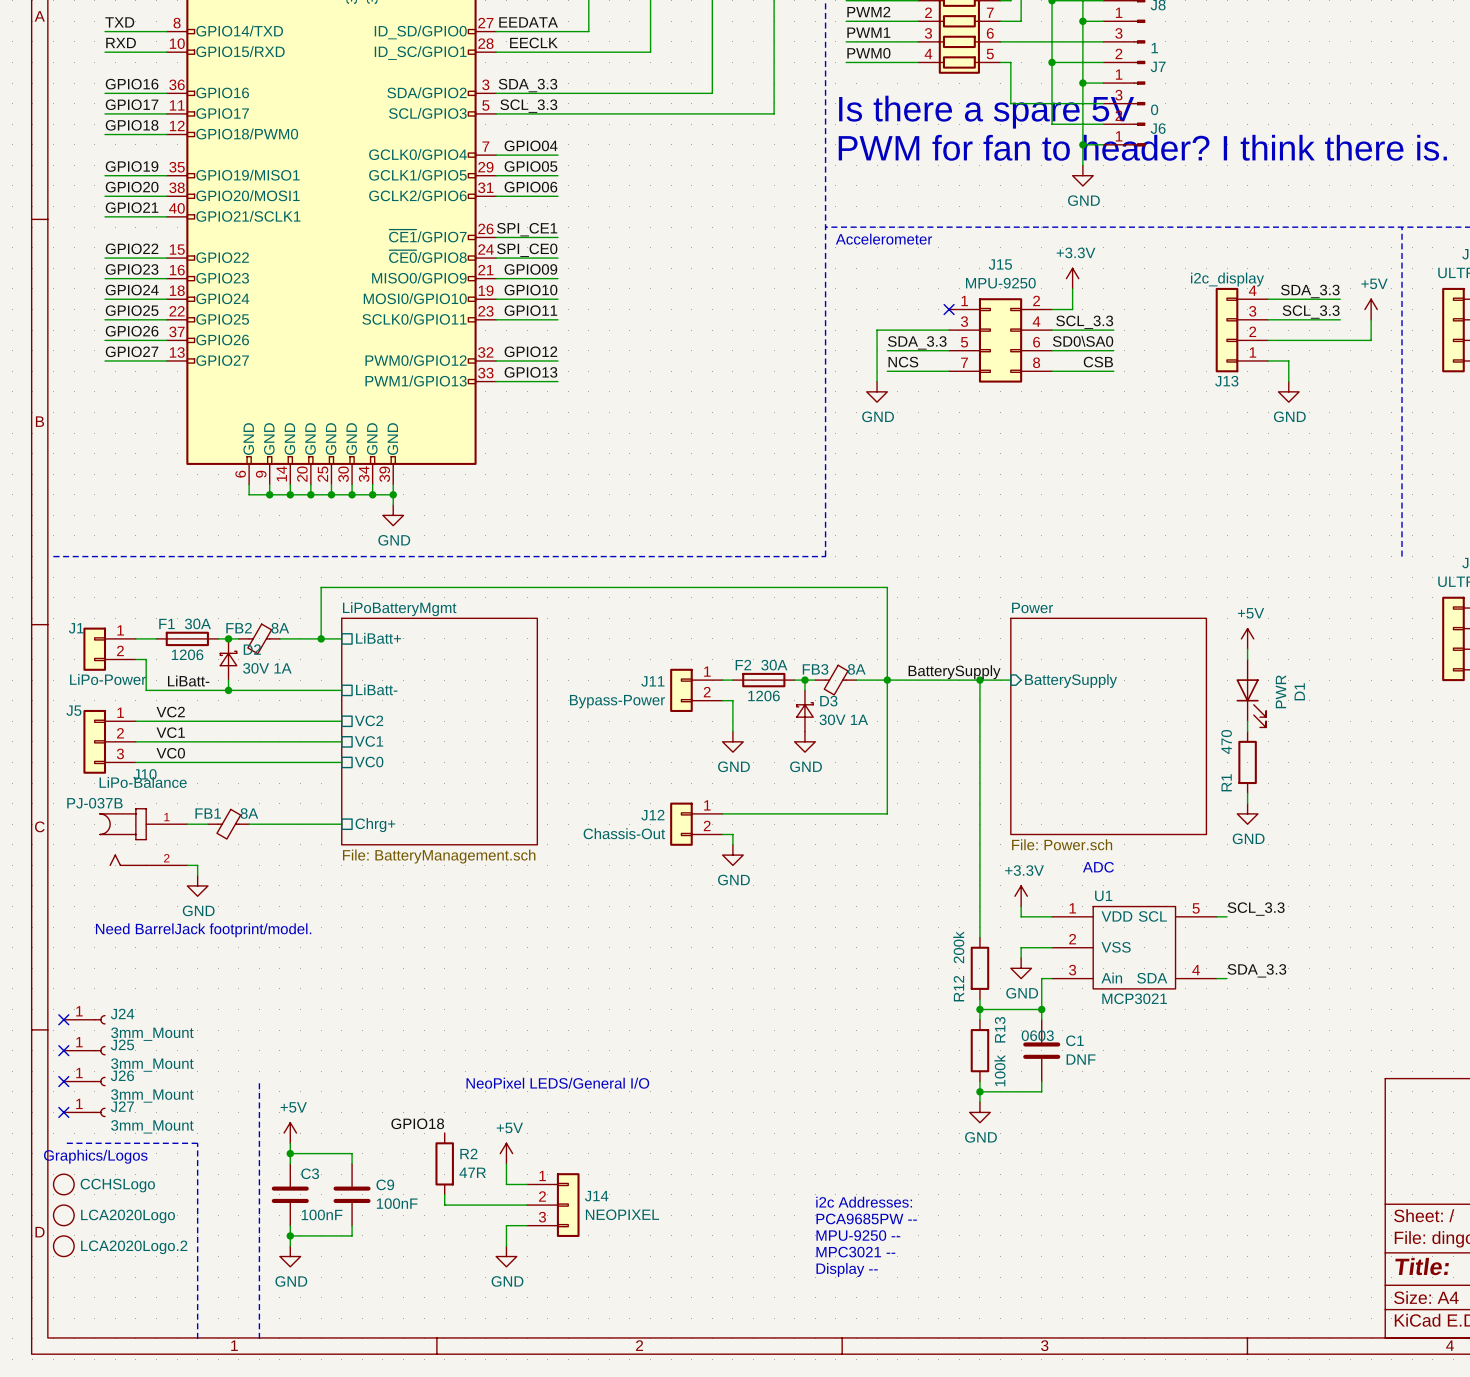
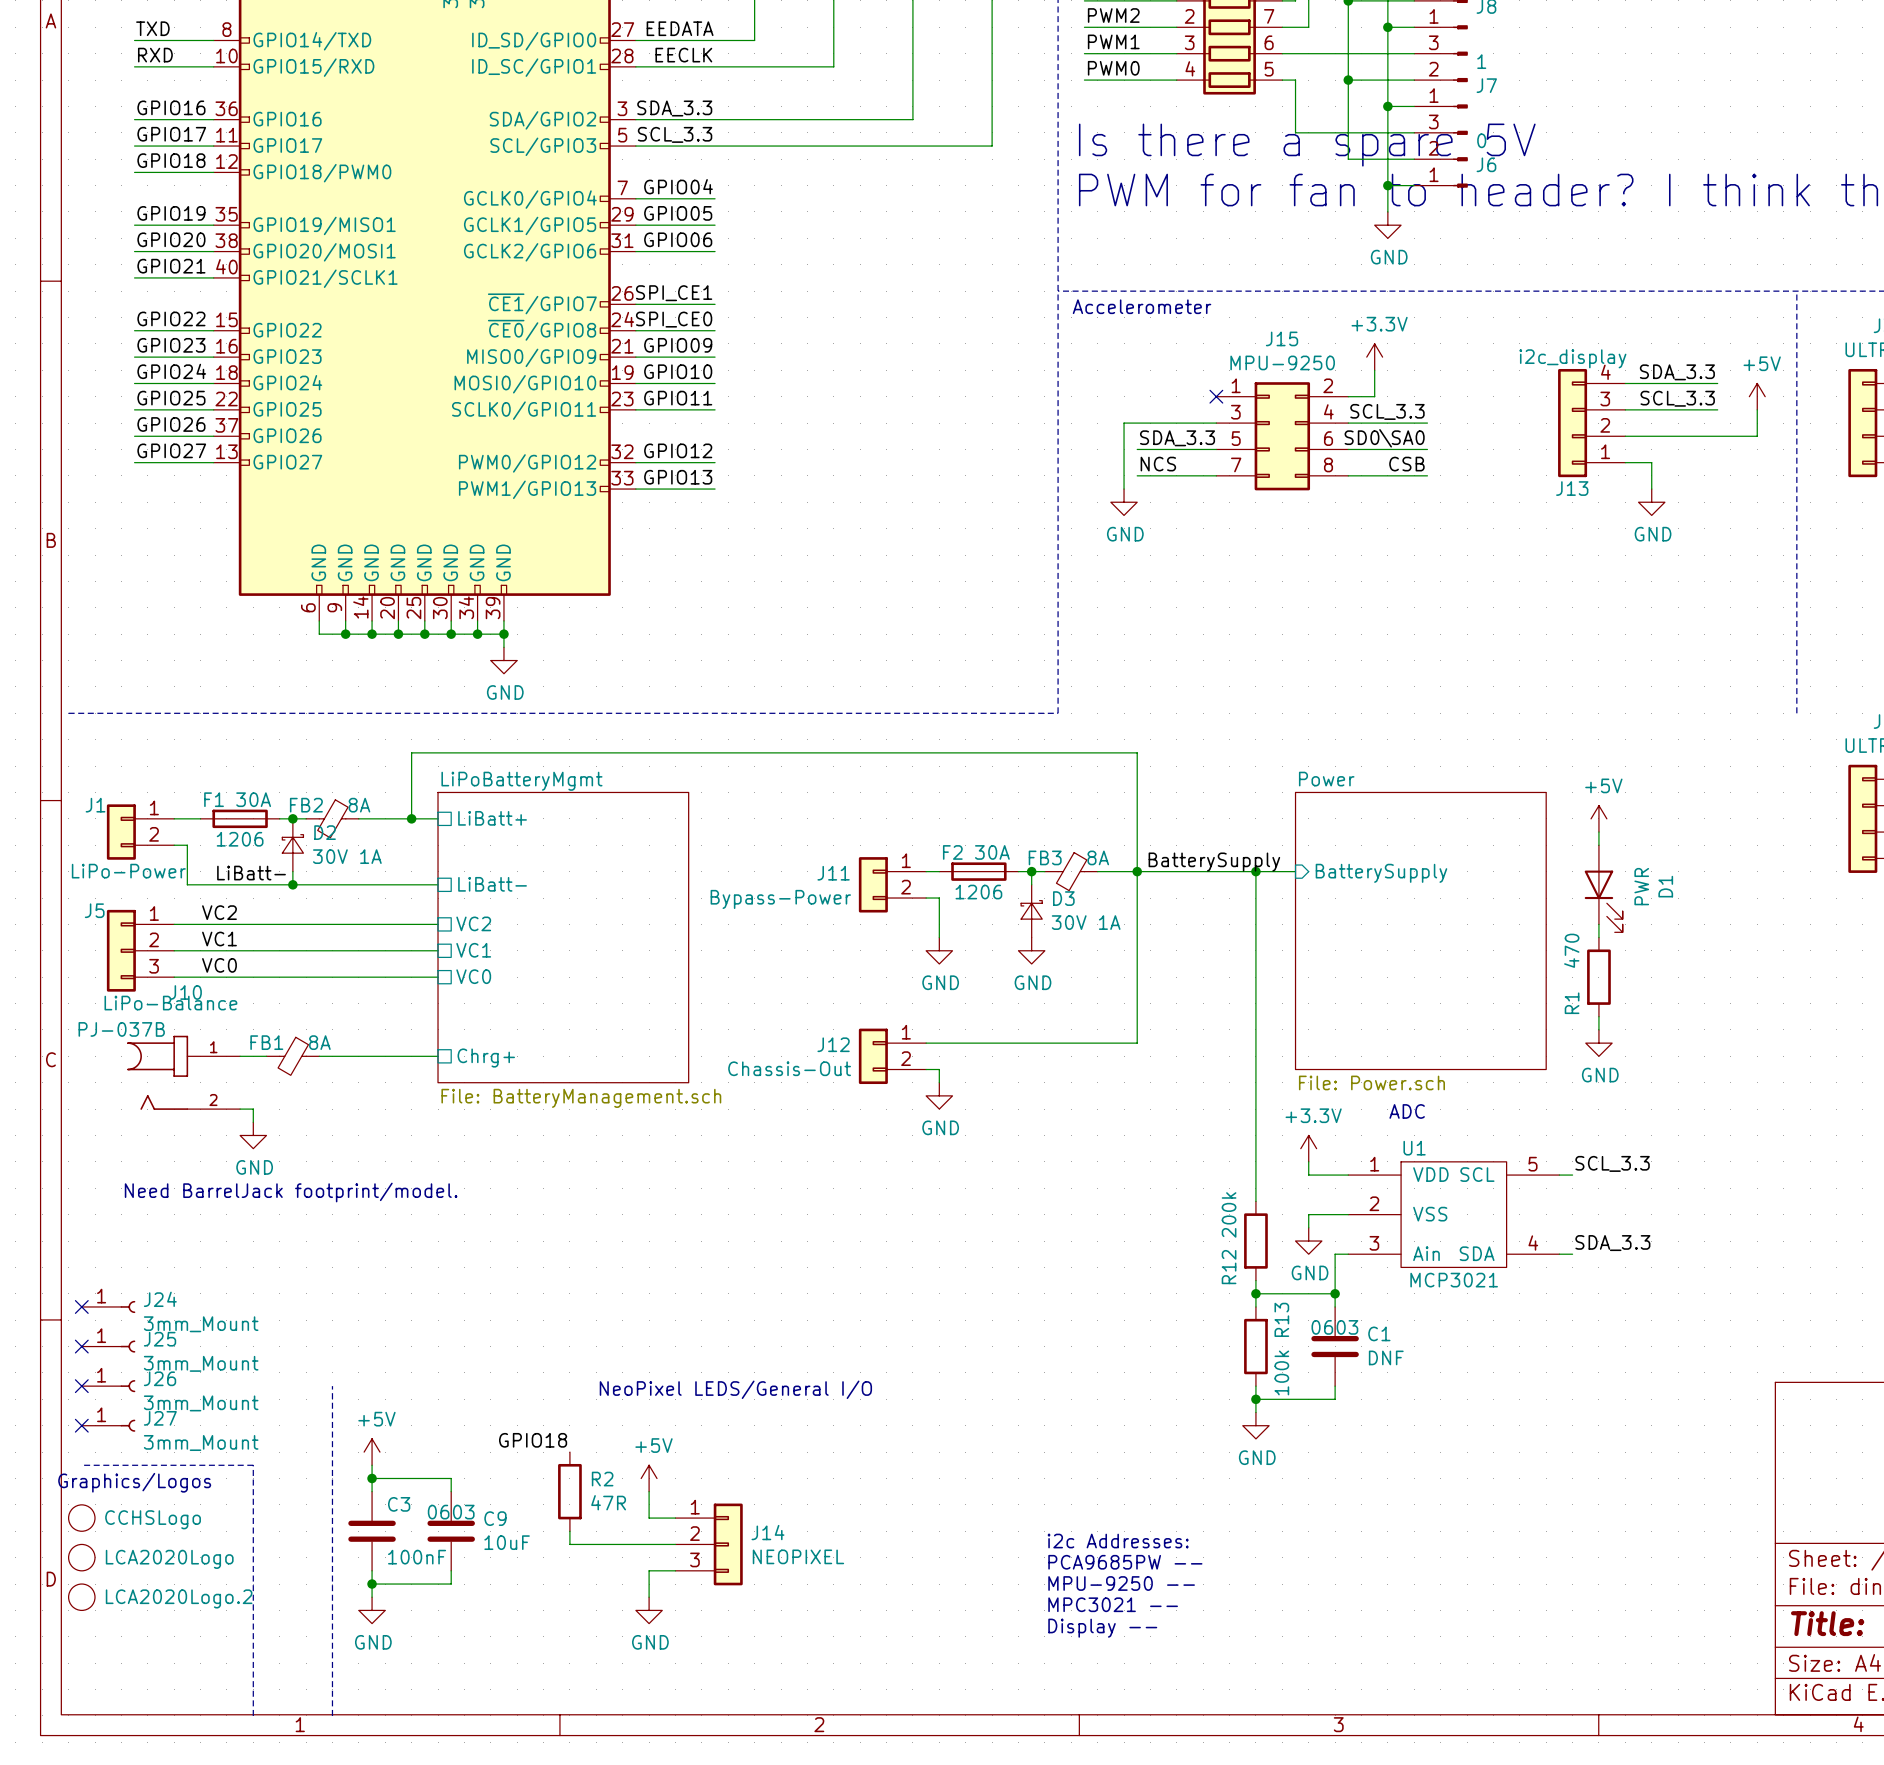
C9 text: none -> 0603 (451, 1512)
C9 value: 100nF (397, 1203) -> 10uF (507, 1542)

